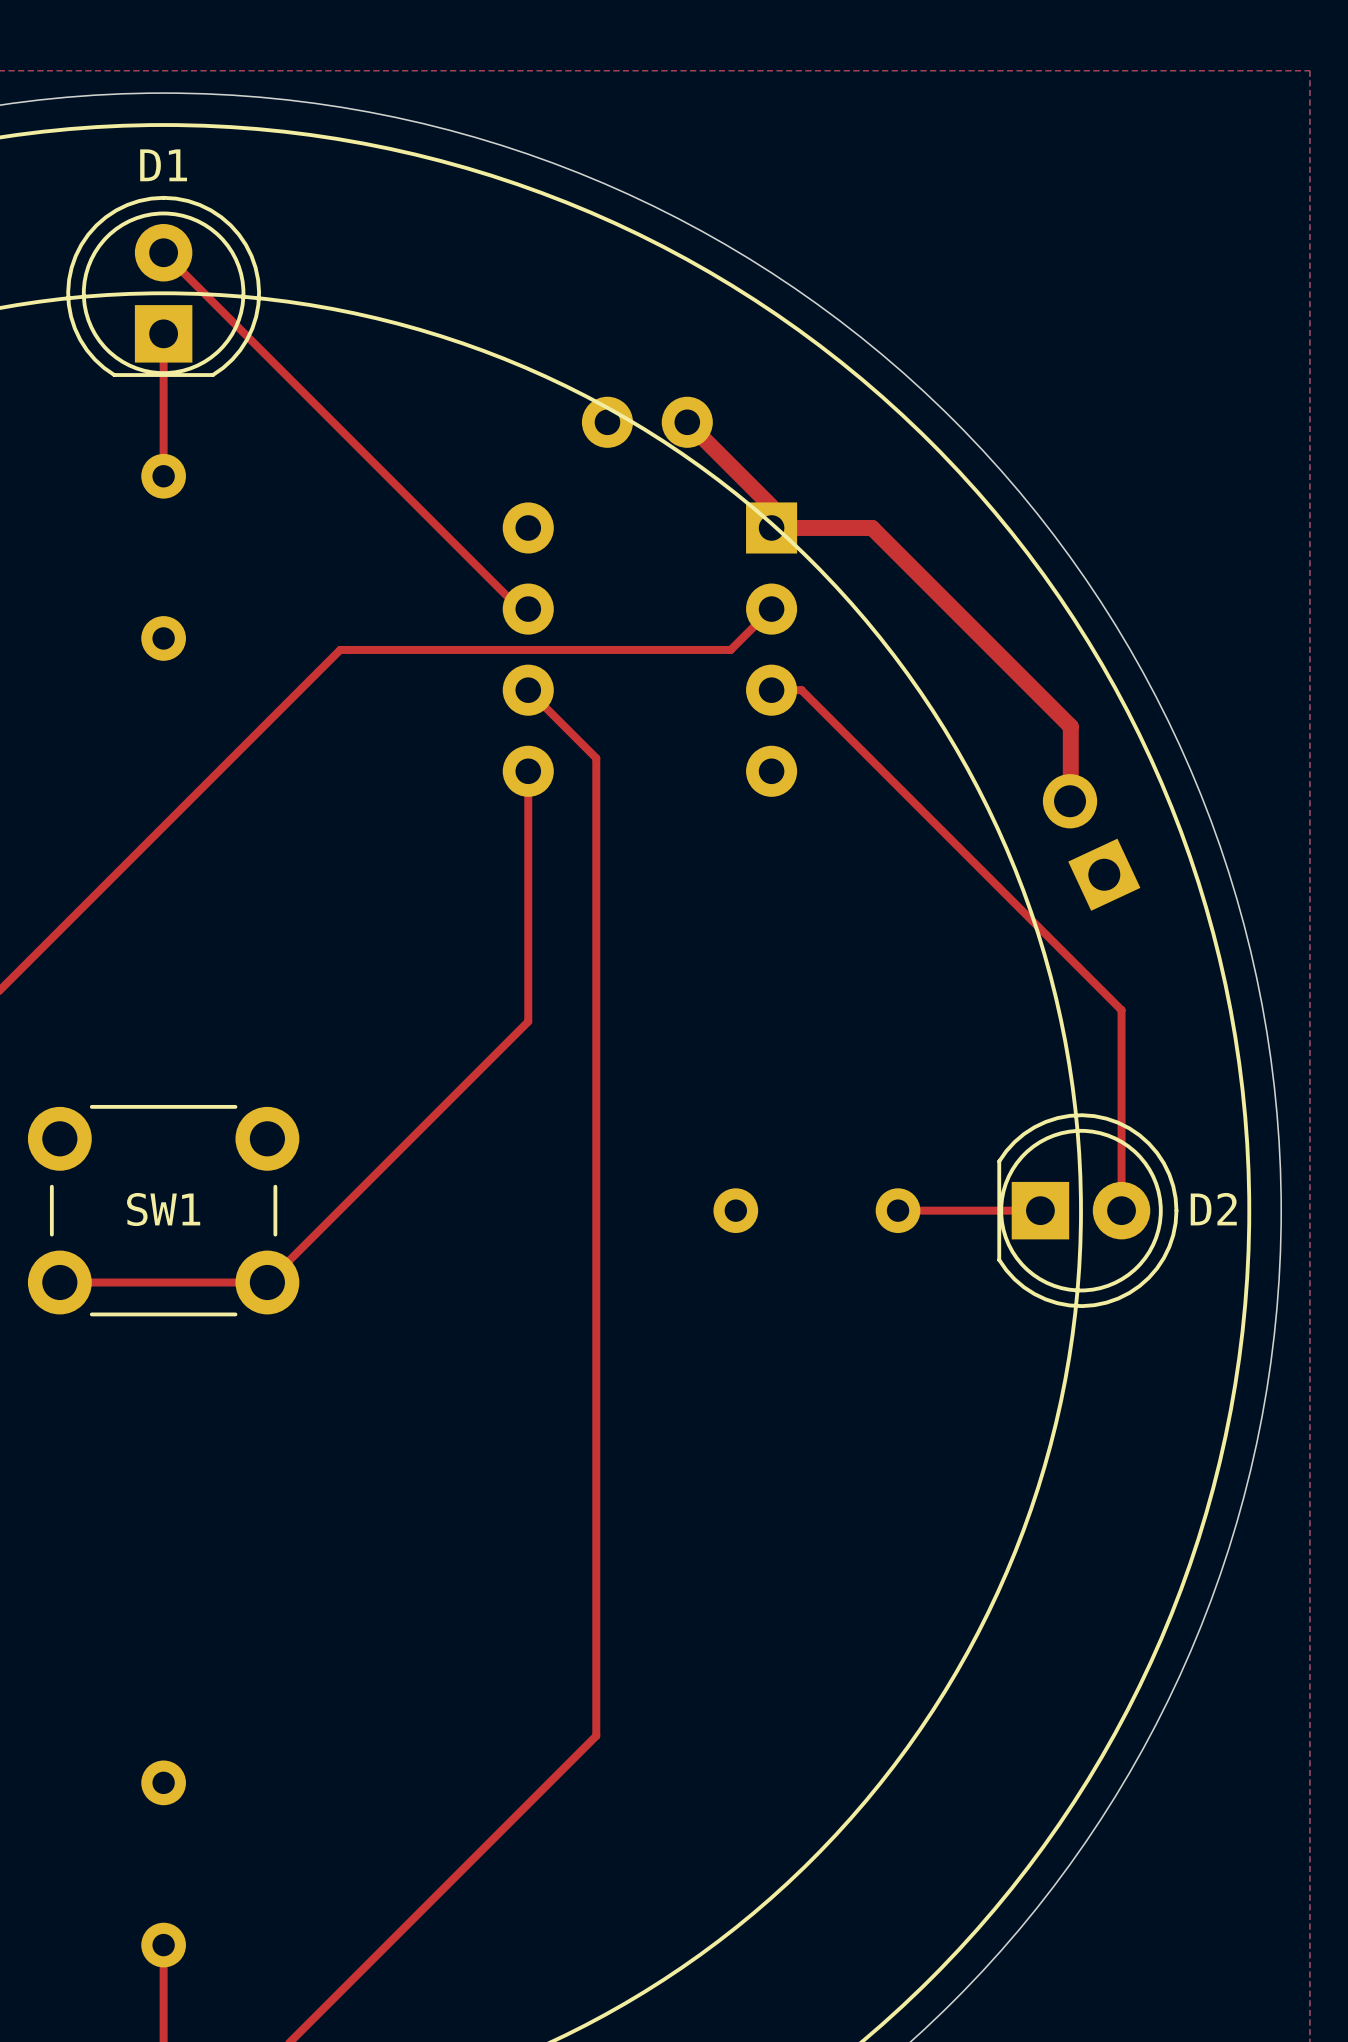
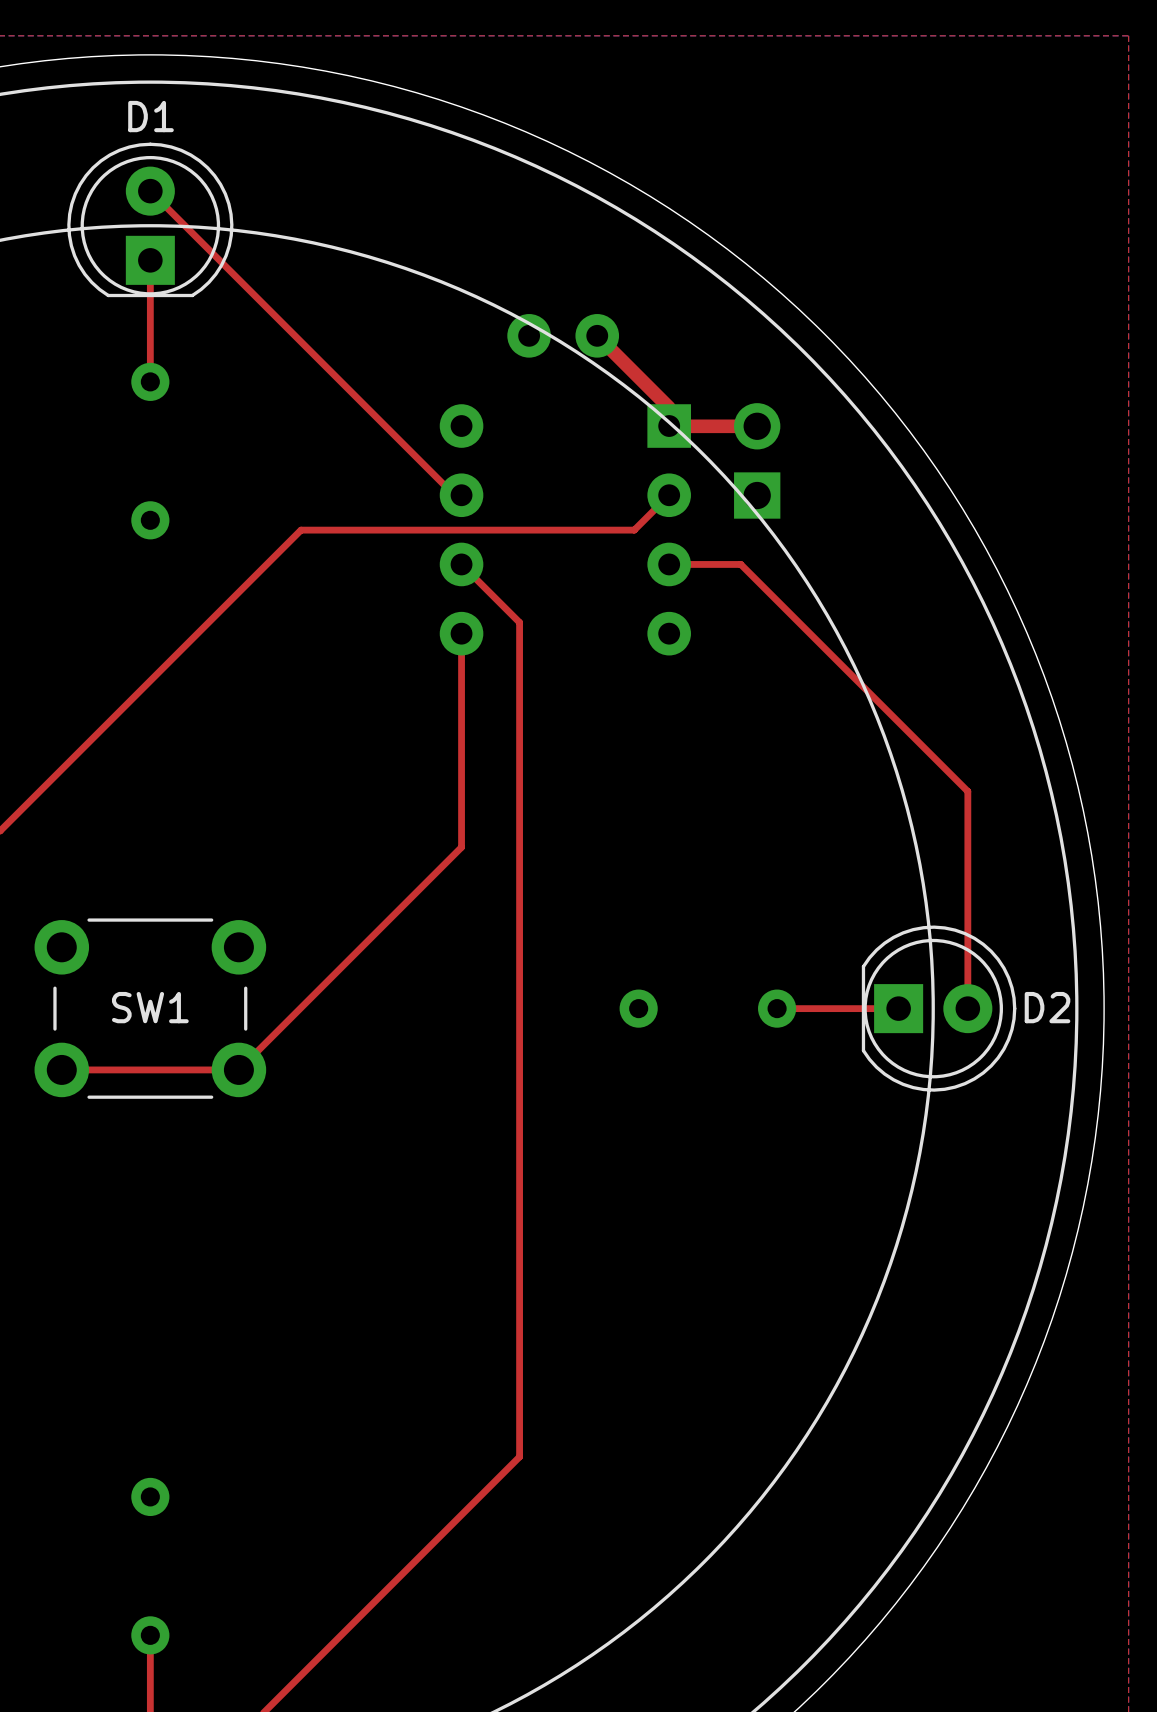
top track: (771, 527) (872, 527) (1070, 726) (1070, 800) -> (669, 426) (757, 426)
part: none -> (757, 460)
top track: (801, 690) (1121, 1010) -> (694, 564) (740, 564) (967, 791) (967, 837)
part: (1091, 842) -> none

